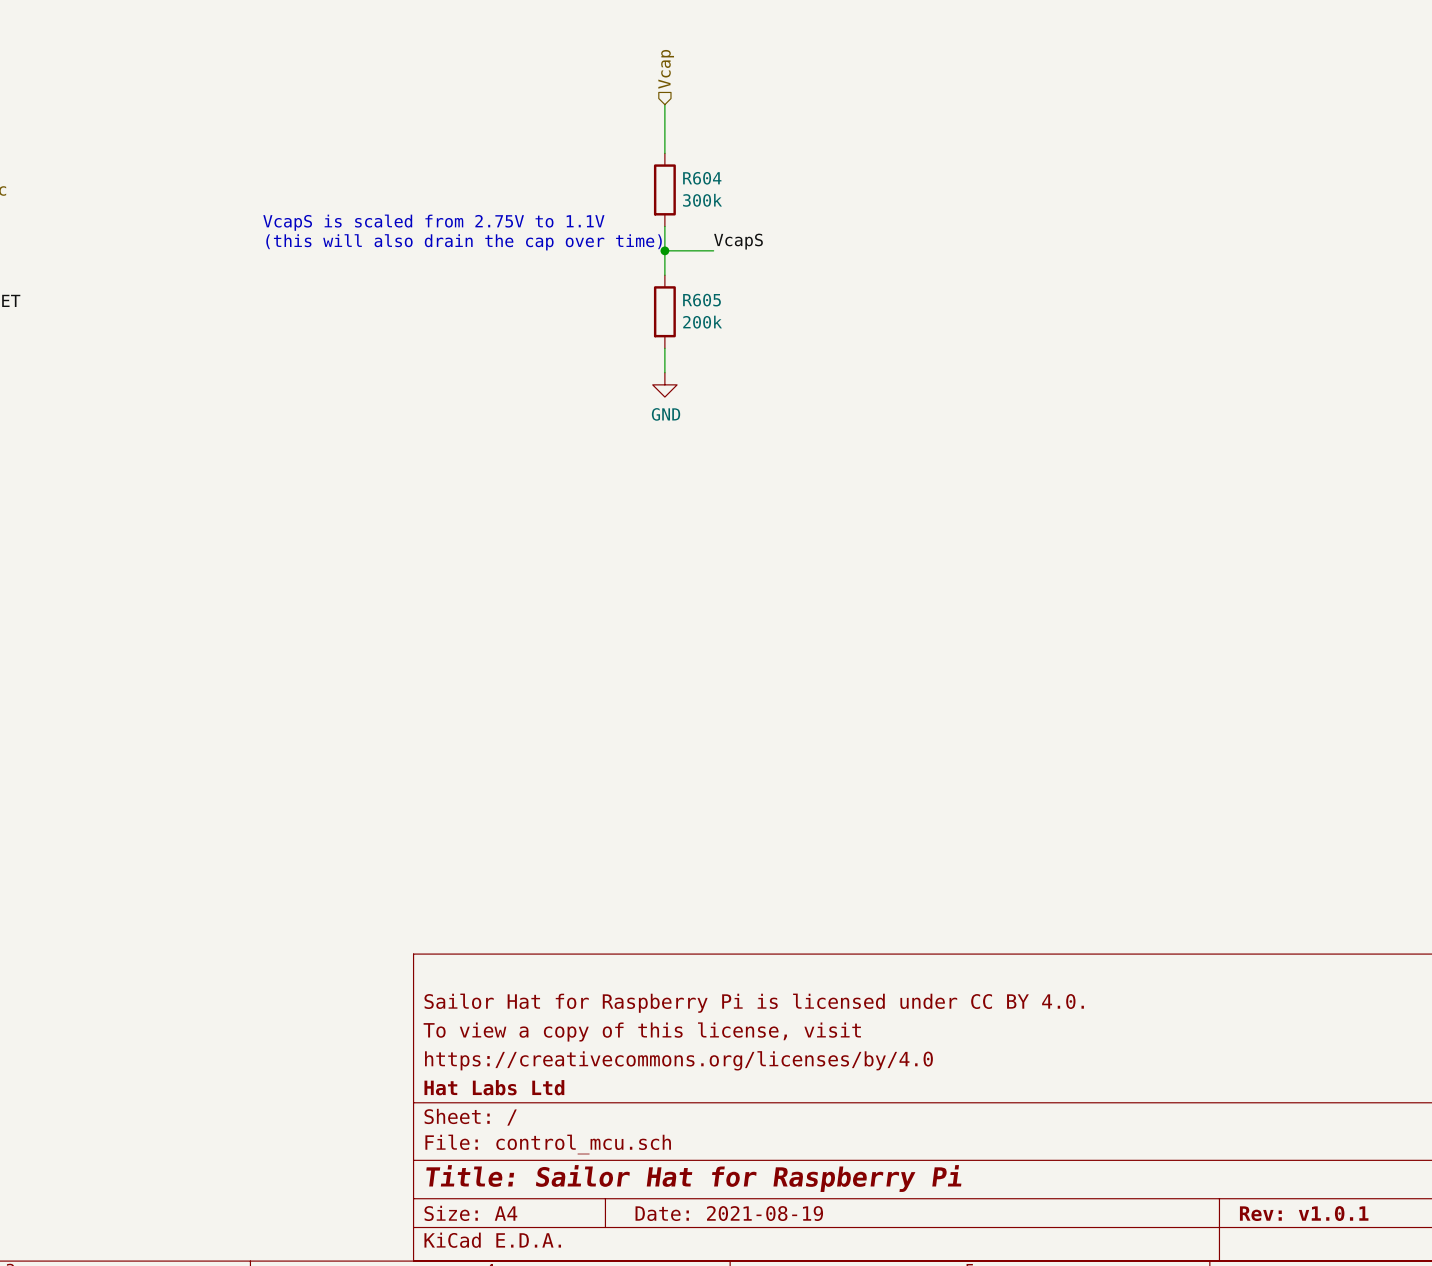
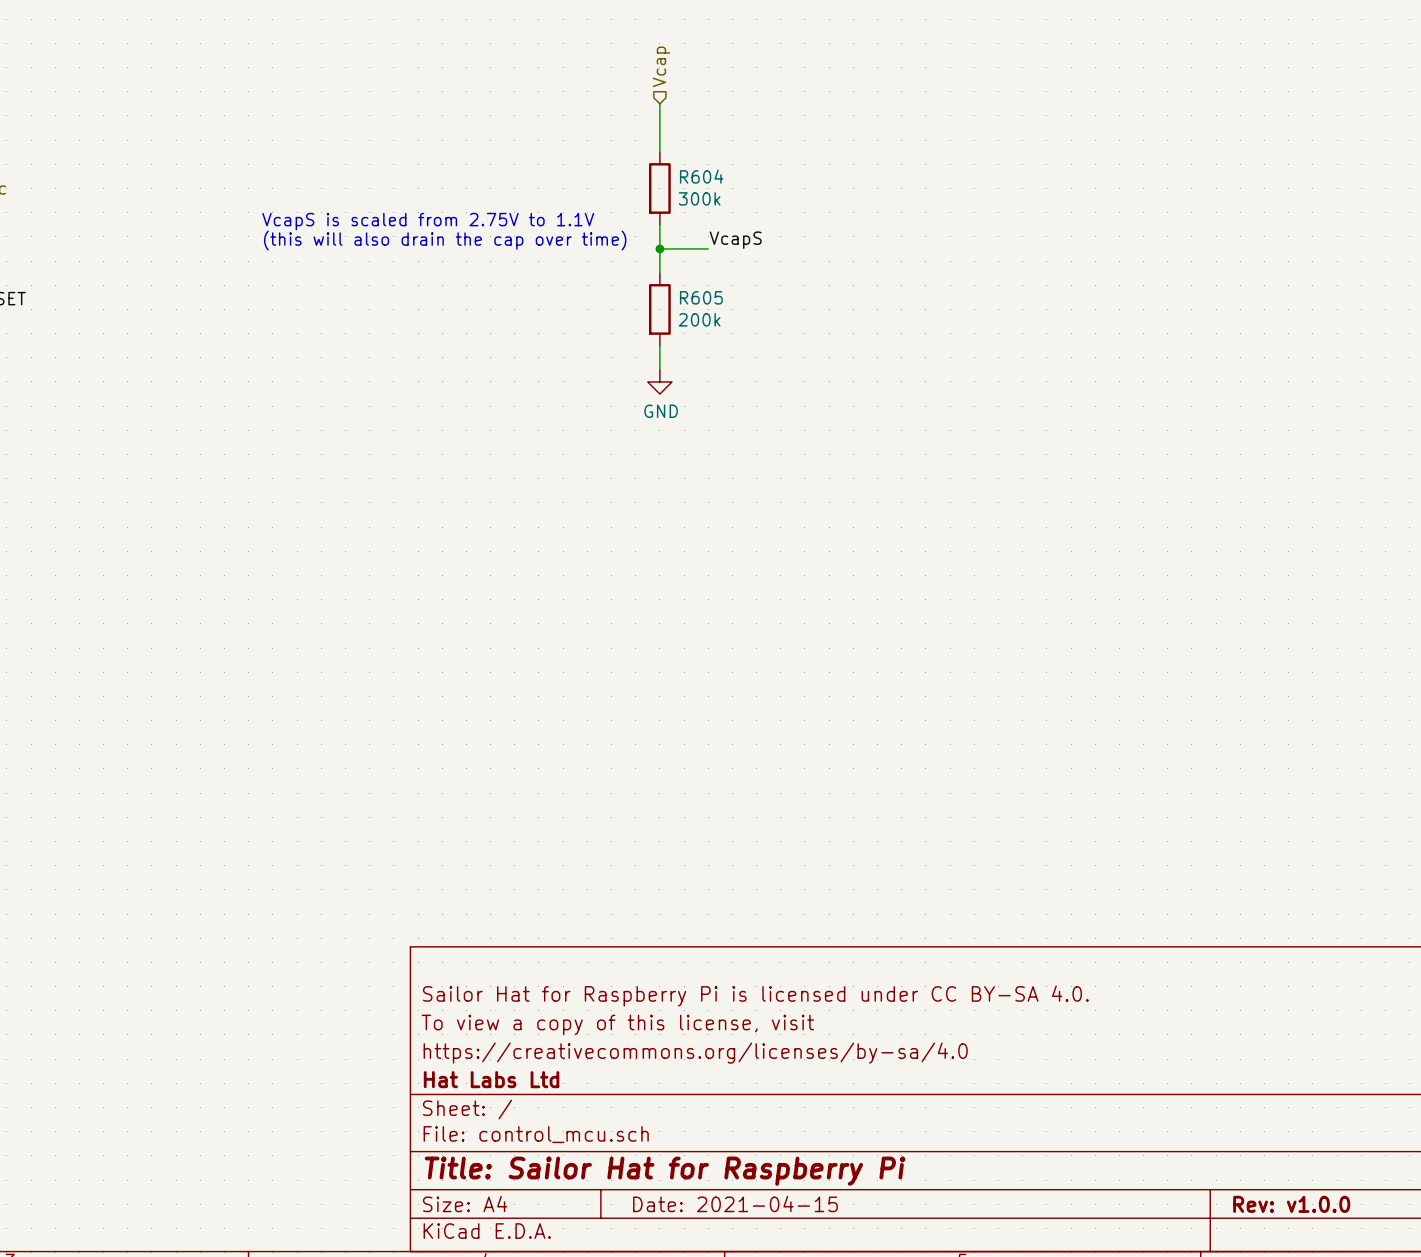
title block: Sailor Hat for Raspberry Pi is licensed under CC BY 4.0. (754, 1003) -> Sailor Hat for Raspberry Pi is licensed under CC BY-SA 4.0. (755, 995)
title block: https://creativecommons.org/licenses/by/4.0 (678, 1060) -> https://creativecommons.org/licenses/by-sa/4.0 (695, 1053)
title block: Date: 2021-08-19 (729, 1213) -> Date: 2021-04-15 (735, 1204)
title block: Rev: v1.0.1 (1304, 1213) -> Rev: v1.0.0 (1291, 1204)

